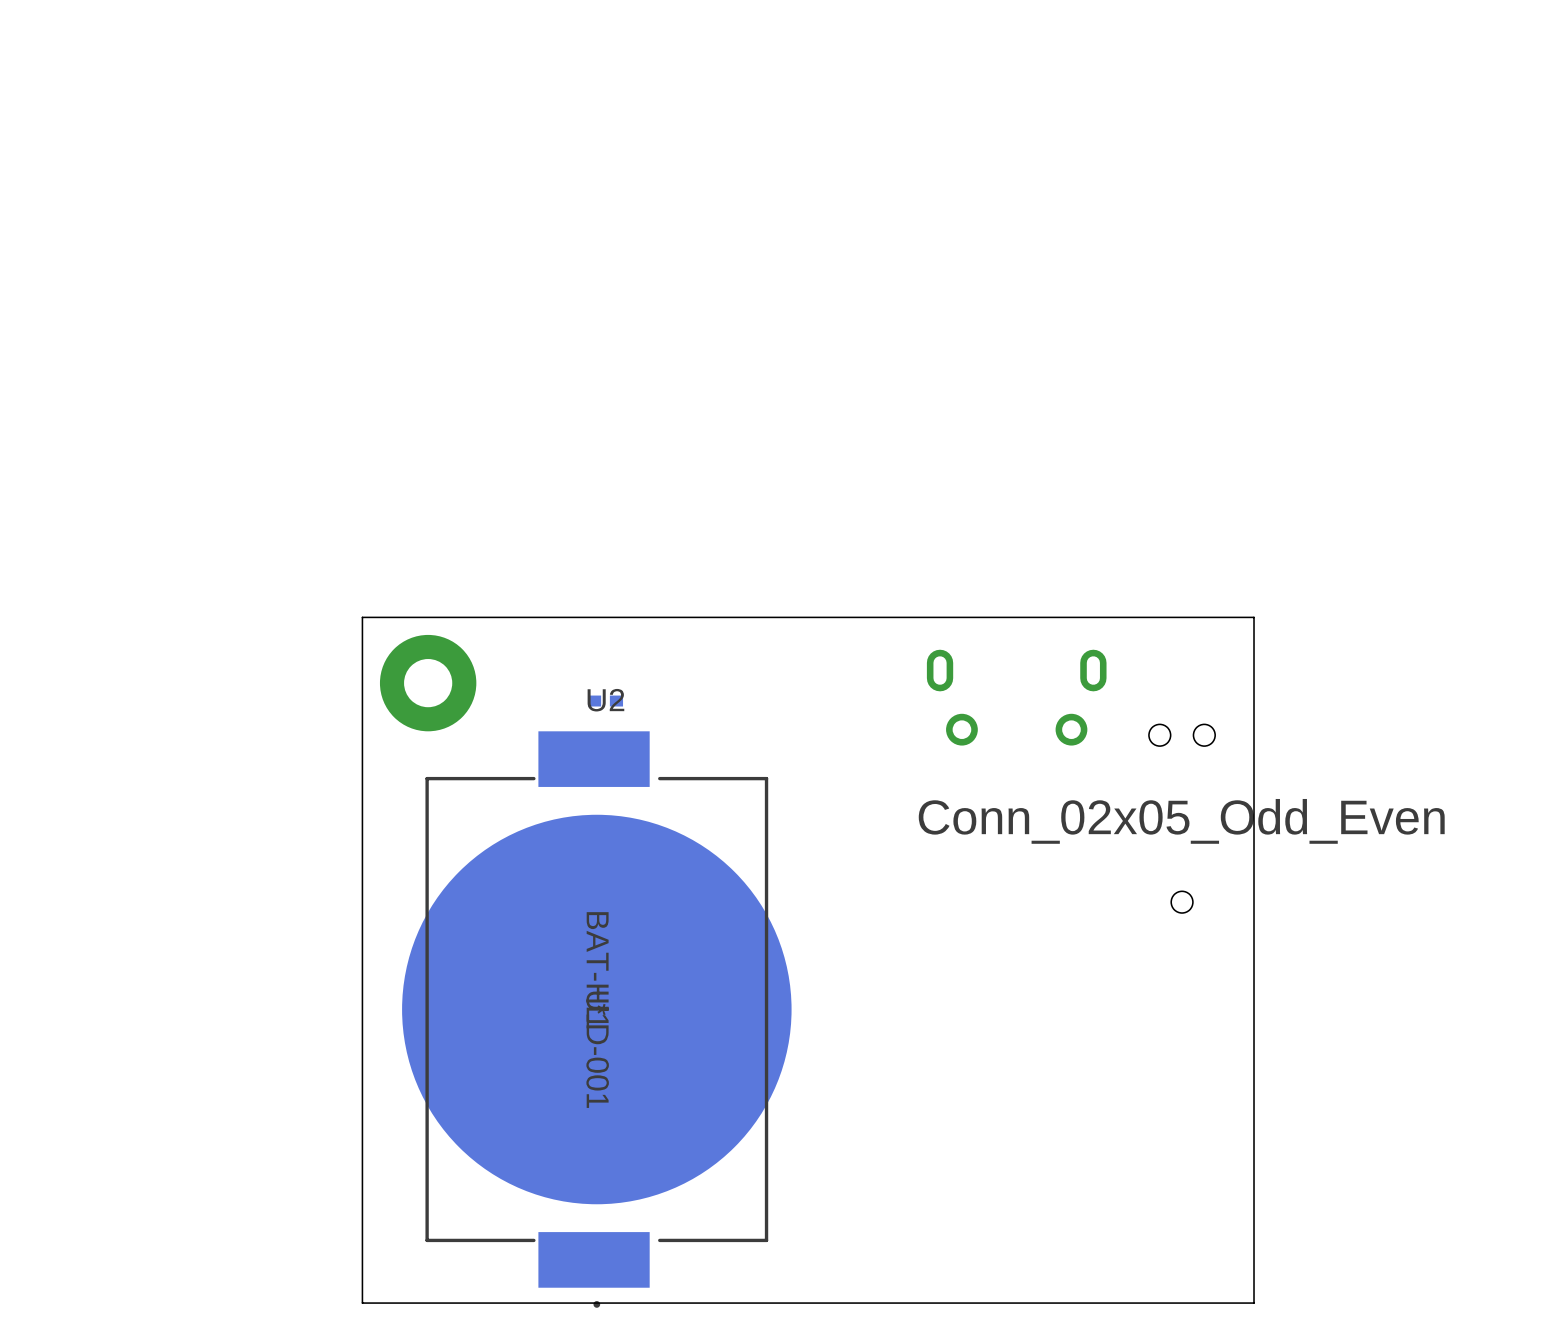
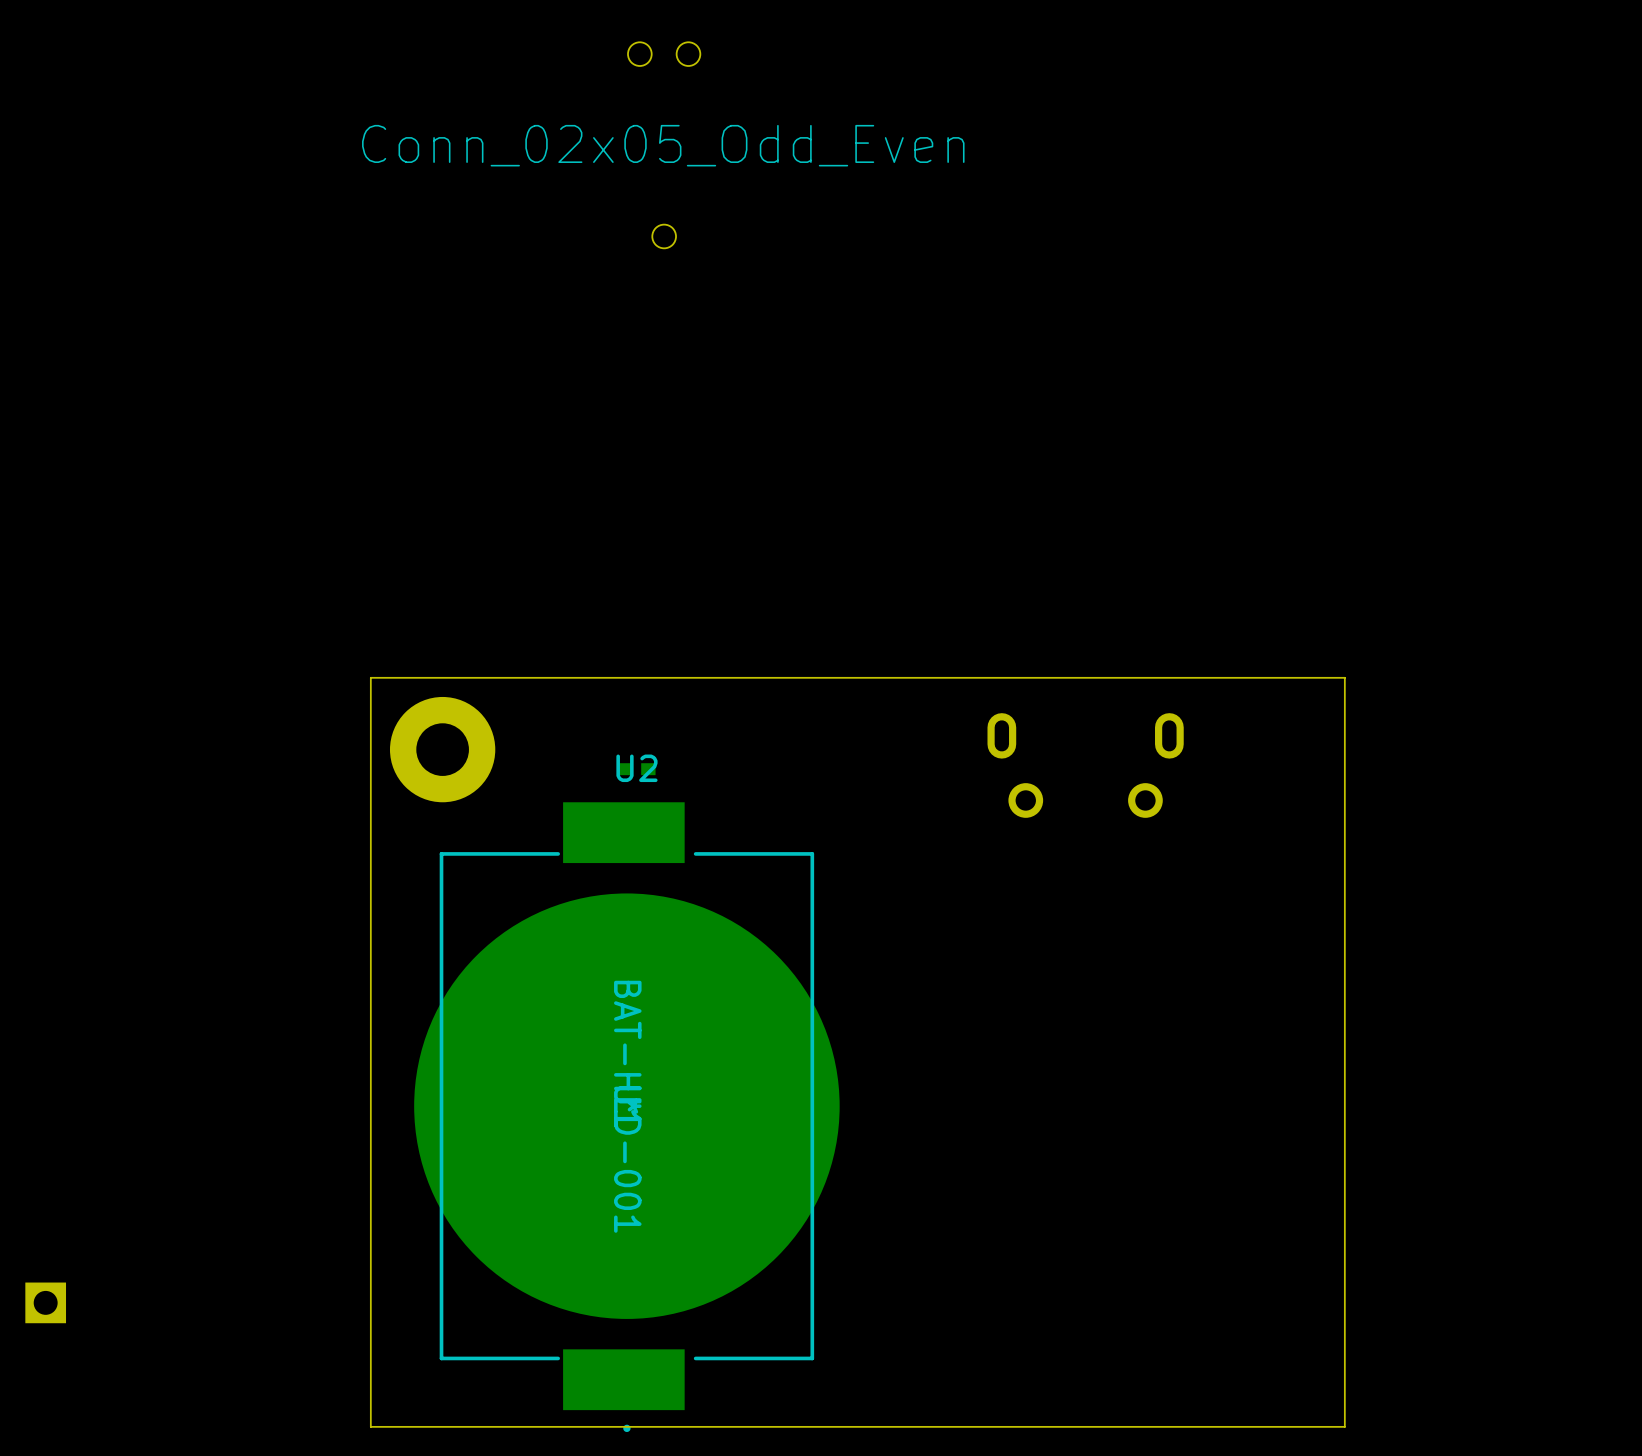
part: none -> Conn_02x05_Odd_Even (664, 145)
part: Conn_02x05_Odd_Even (1182, 818) -> none
part: none -> (45, 1302)

